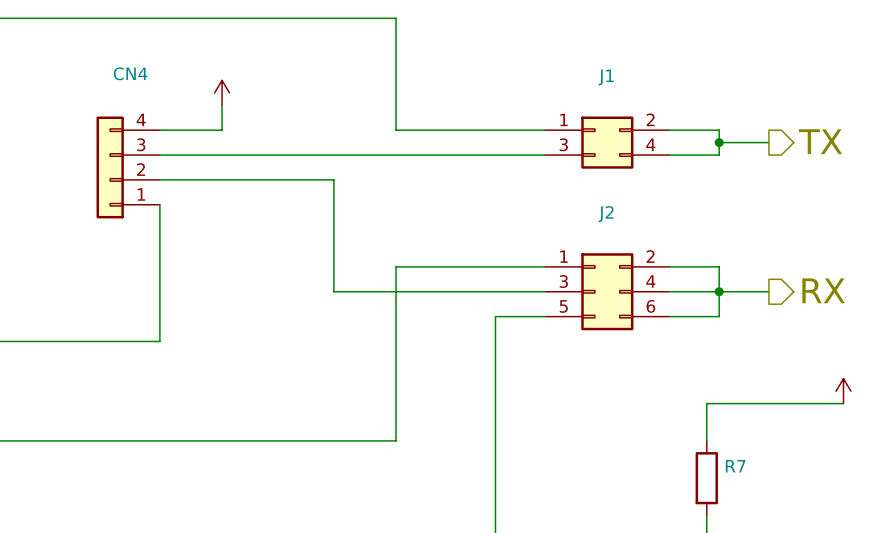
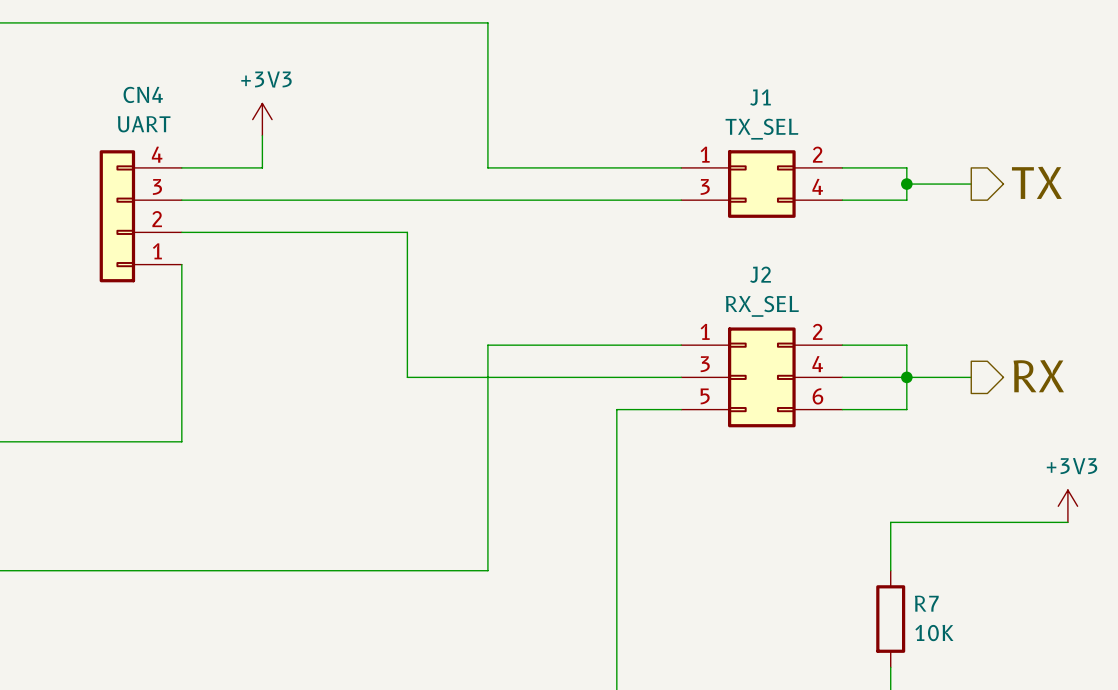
power symbol text: none -> +3V3 (266, 79)
CN4 value: none -> UART (144, 124)
J1 value: none -> TX_SEL (761, 129)
J2 value: none -> RX_SEL (762, 306)
power symbol text: none -> +3V3 (1072, 466)
R7 value: none -> 10K (934, 633)

